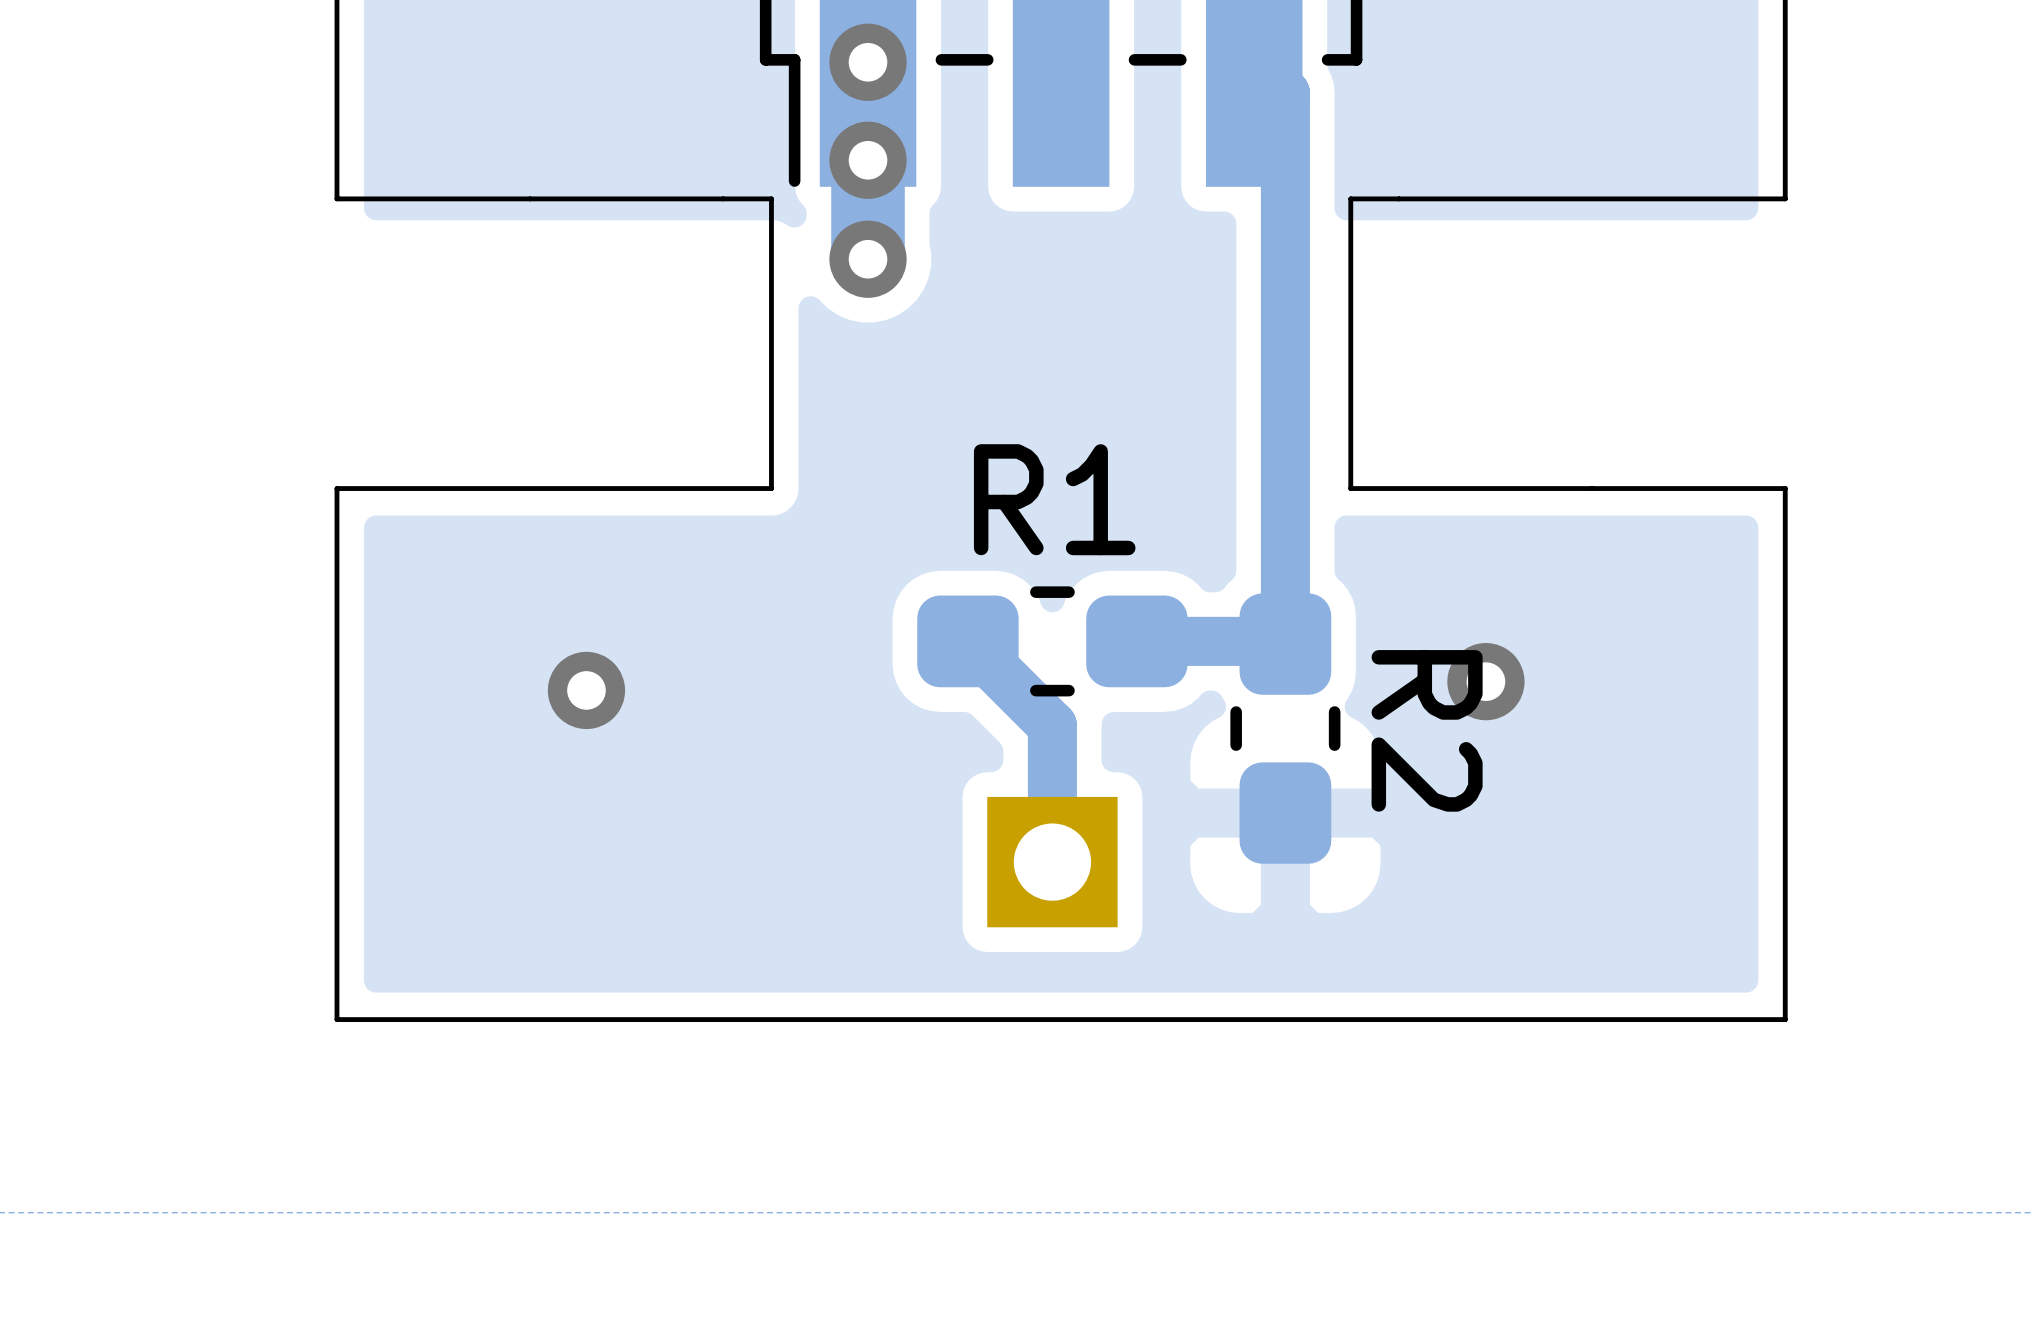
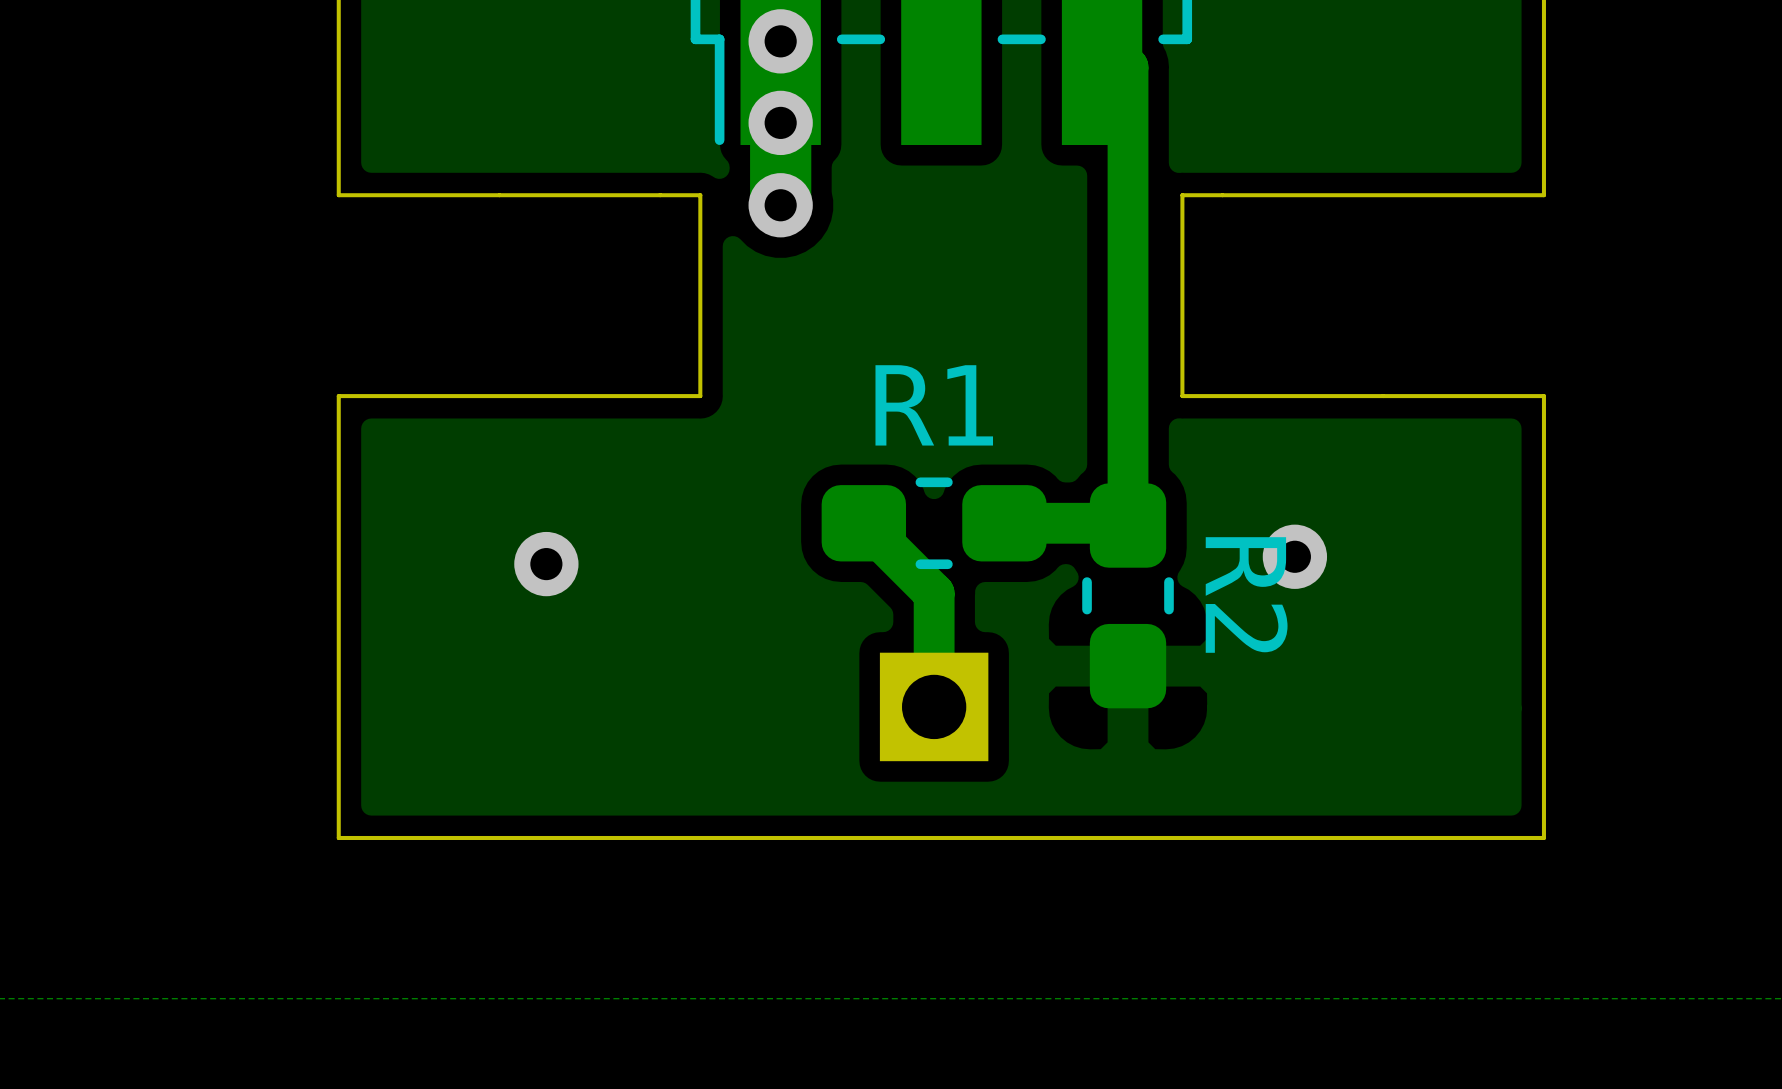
board edge: (336, 198) (771, 198) (771, 247) -> (338, 155) (338, 195) (700, 195)
board edge: (1785, 198) (1350, 198) (1350, 247) -> (1543, 155) (1543, 195) (1182, 195)

